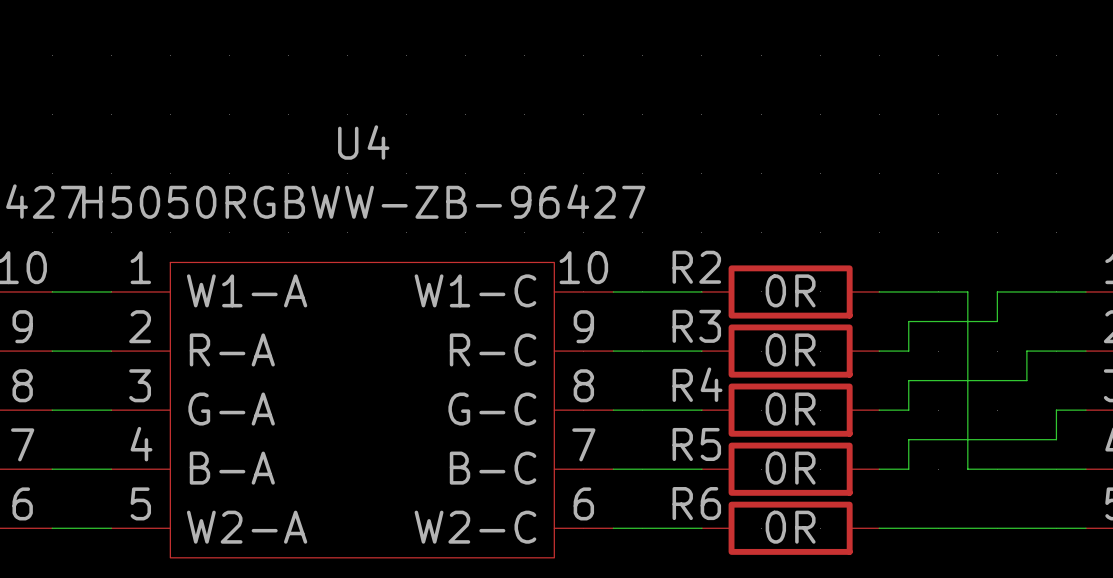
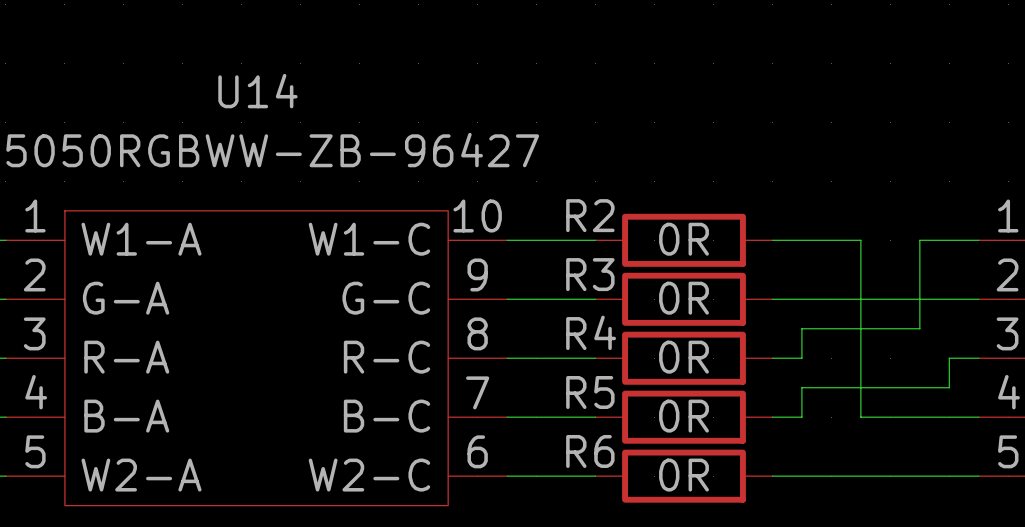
U4 name: U4 (363, 142) -> U14 (257, 91)
wire: (1026, 291) (997, 291) (997, 321) (908, 321) (908, 351) -> (919, 240) (919, 299) (801, 299)
U4 pin name: R-A (232, 349) -> G-A (126, 298)
U4 pin name: R-C (493, 349) -> G-C (386, 298)
U4 pin name: G-A (231, 409) -> R-A (126, 357)
U4 pin name: G-C (492, 409) -> R-C (387, 357)

